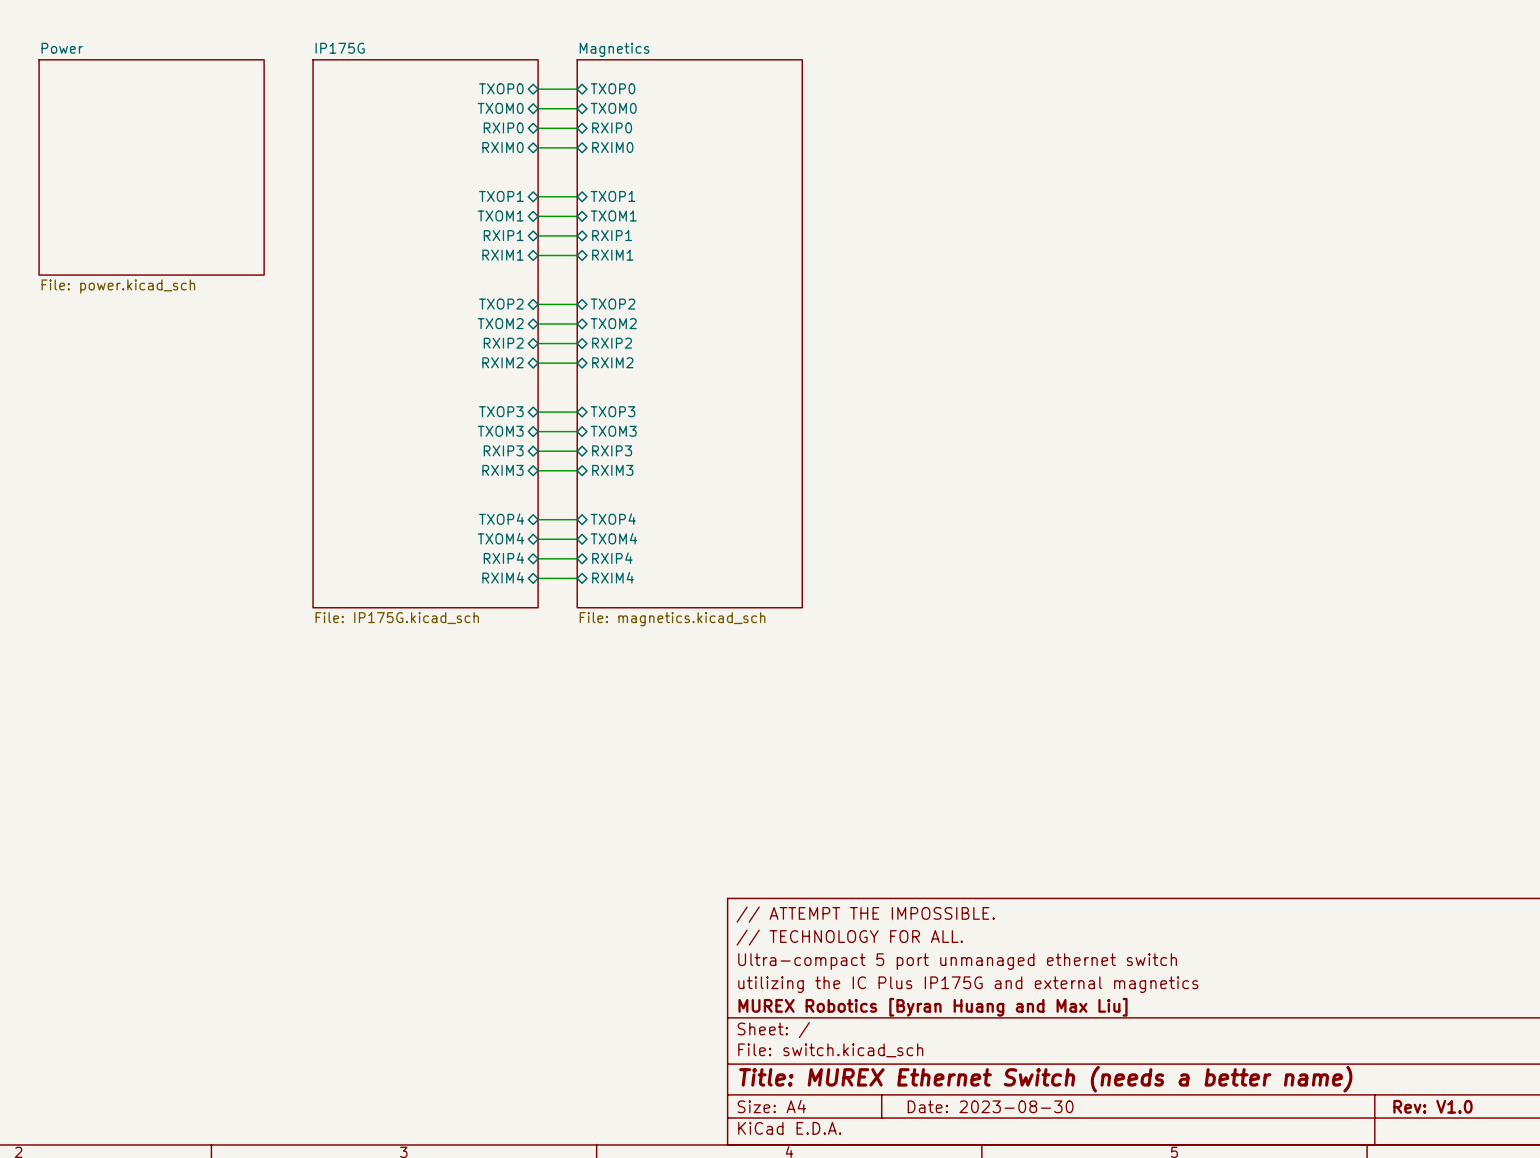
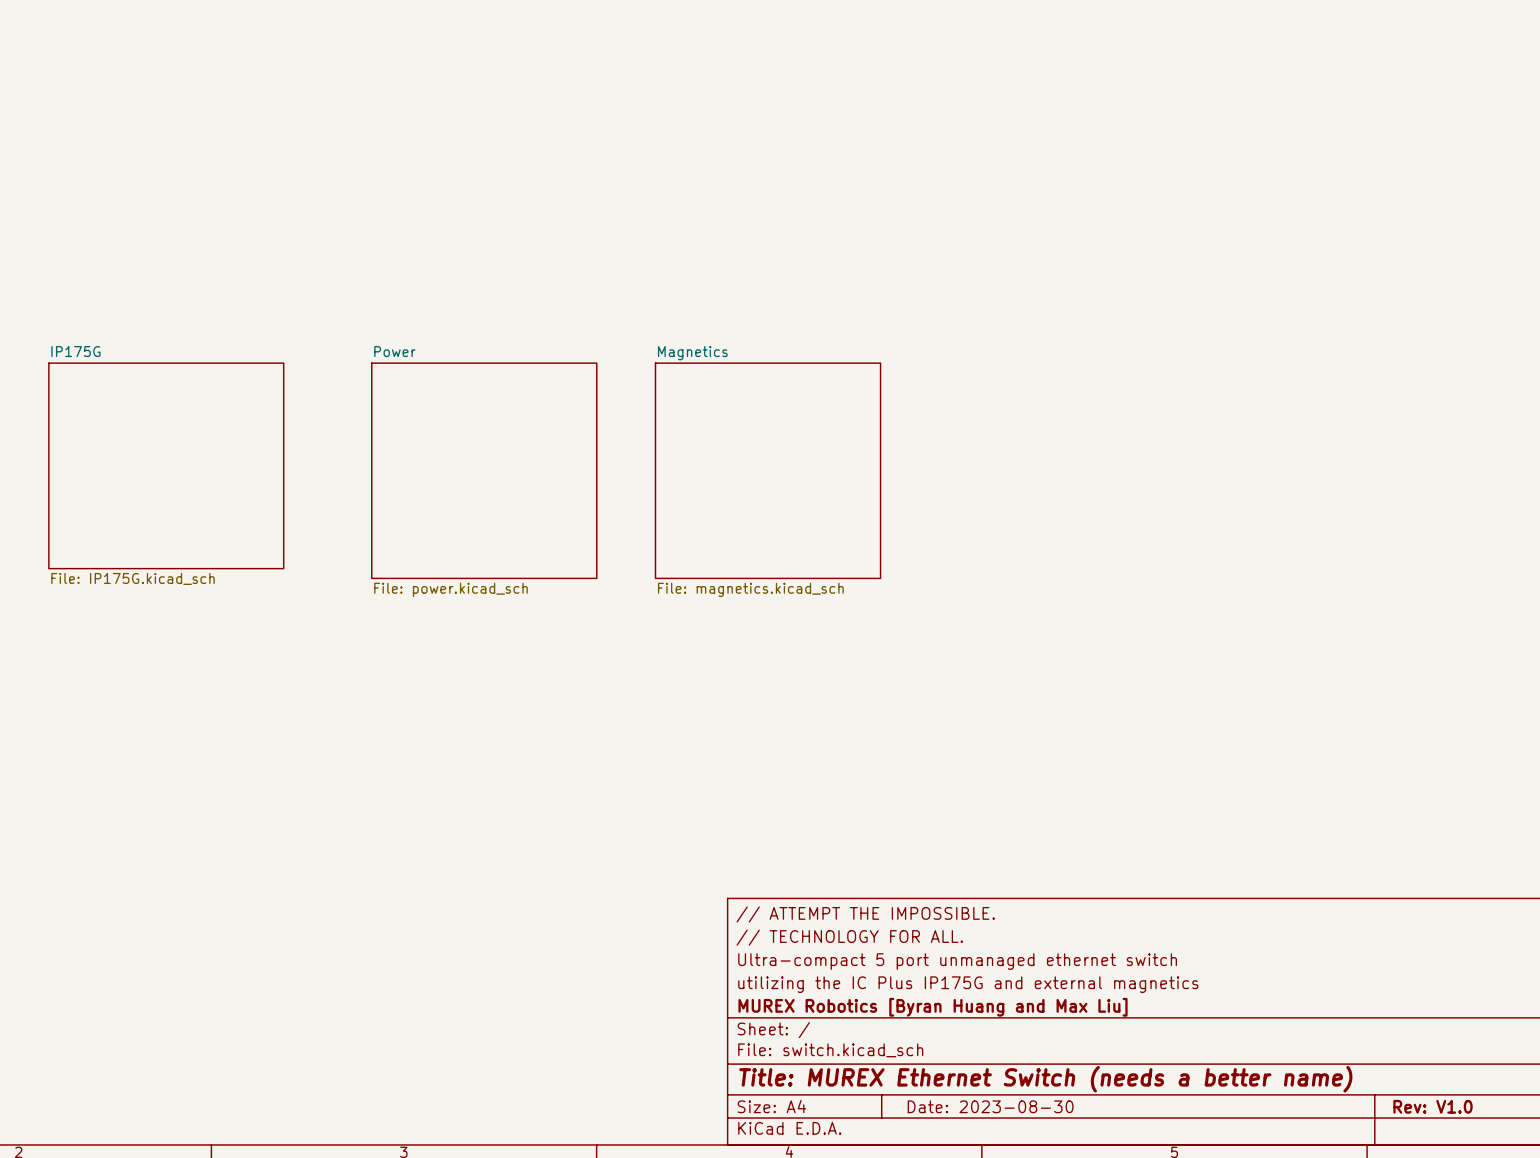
sheet IP175G name position: IP175G (340, 48) -> IP175G (75, 351)
sheet IP175G shape: [312, 59, 539, 609] -> [48, 362, 285, 570]
sheet pin: TXOP0 (501, 88) -> none
sheet pin: TXOP0 (613, 88) -> none
wire: (538, 89) (577, 89) -> none
sheet pin: TXOM0 (500, 108) -> none
wire: (538, 108) (577, 108) -> none
sheet pin: TXOM0 (613, 108) -> none
sheet pin: RXIP0 (503, 127) -> none
sheet pin: RXIP0 (612, 127) -> none
wire: (538, 128) (577, 128) -> none
sheet pin: RXIM0 (502, 147) -> none
wire: (538, 147) (577, 147) -> none
sheet pin: RXIM0 (612, 147) -> none
sheet Power: File: power.kicad_sch (151, 167) -> none
sheet pin: TXOP1 (501, 196) -> none
wire: (538, 196) (577, 196) -> none
sheet pin: TXOP1 (613, 196) -> none
sheet pin: TXOM1 (500, 216) -> none
wire: (538, 216) (577, 216) -> none
sheet pin: TXOM1 (613, 216) -> none
sheet pin: RXIP1 (503, 235) -> none
wire: (538, 235) (577, 235) -> none
sheet pin: RXIP1 (612, 235) -> none
sheet pin: RXIM1 (502, 255) -> none
wire: (538, 255) (577, 255) -> none
sheet pin: RXIM1 (612, 255) -> none
sheet pin: TXOP2 (501, 304) -> none
wire: (538, 304) (577, 304) -> none
sheet pin: TXOP2 (613, 304) -> none
sheet pin: TXOM2 (500, 323) -> none
sheet pin: TXOM2 (613, 323) -> none
wire: (538, 324) (577, 324) -> none
sheet Magnetics: File: magnetics.kicad_sch (689, 333) -> none
sheet pin: RXIP2 (503, 343) -> none
wire: (538, 343) (577, 343) -> none
sheet pin: RXIP2 (612, 343) -> none
sheet pin: RXIM2 (502, 362) -> none
sheet pin: RXIM2 (612, 362) -> none
sheet pin: TXOP3 (501, 411) -> none
sheet pin: TXOP3 (613, 411) -> none
wire: (538, 412) (577, 412) -> none
sheet pin: TXOM3 (500, 431) -> none
wire: (538, 431) (577, 431) -> none
sheet pin: TXOM3 (613, 431) -> none
sheet pin: RXIP3 (503, 450) -> none
sheet pin: RXIP3 (612, 450) -> none
wire: (538, 451) (577, 451) -> none
sheet Power: none -> File: power.kicad_sch (484, 470)
sheet pin: RXIM3 (502, 470) -> none
wire: (538, 470) (577, 470) -> none
sheet pin: RXIM3 (612, 470) -> none
sheet Magnetics: none -> File: magnetics.kicad_sch (768, 470)
sheet pin: TXOP4 (501, 519) -> none
wire: (538, 519) (577, 519) -> none
sheet pin: TXOP4 (613, 519) -> none
sheet pin: TXOM4 (500, 538) -> none
sheet pin: TXOM4 (613, 538) -> none
wire: (538, 539) (577, 539) -> none
sheet pin: RXIP4 (503, 558) -> none
wire: (538, 558) (577, 558) -> none
sheet pin: RXIP4 (612, 558) -> none
sheet pin: RXIM4 (503, 577) -> none
sheet pin: RXIM4 (613, 577) -> none
sheet IP175G value position: File: IP175G.kicad_sch (397, 618) -> File: IP175G.kicad_sch (133, 578)

